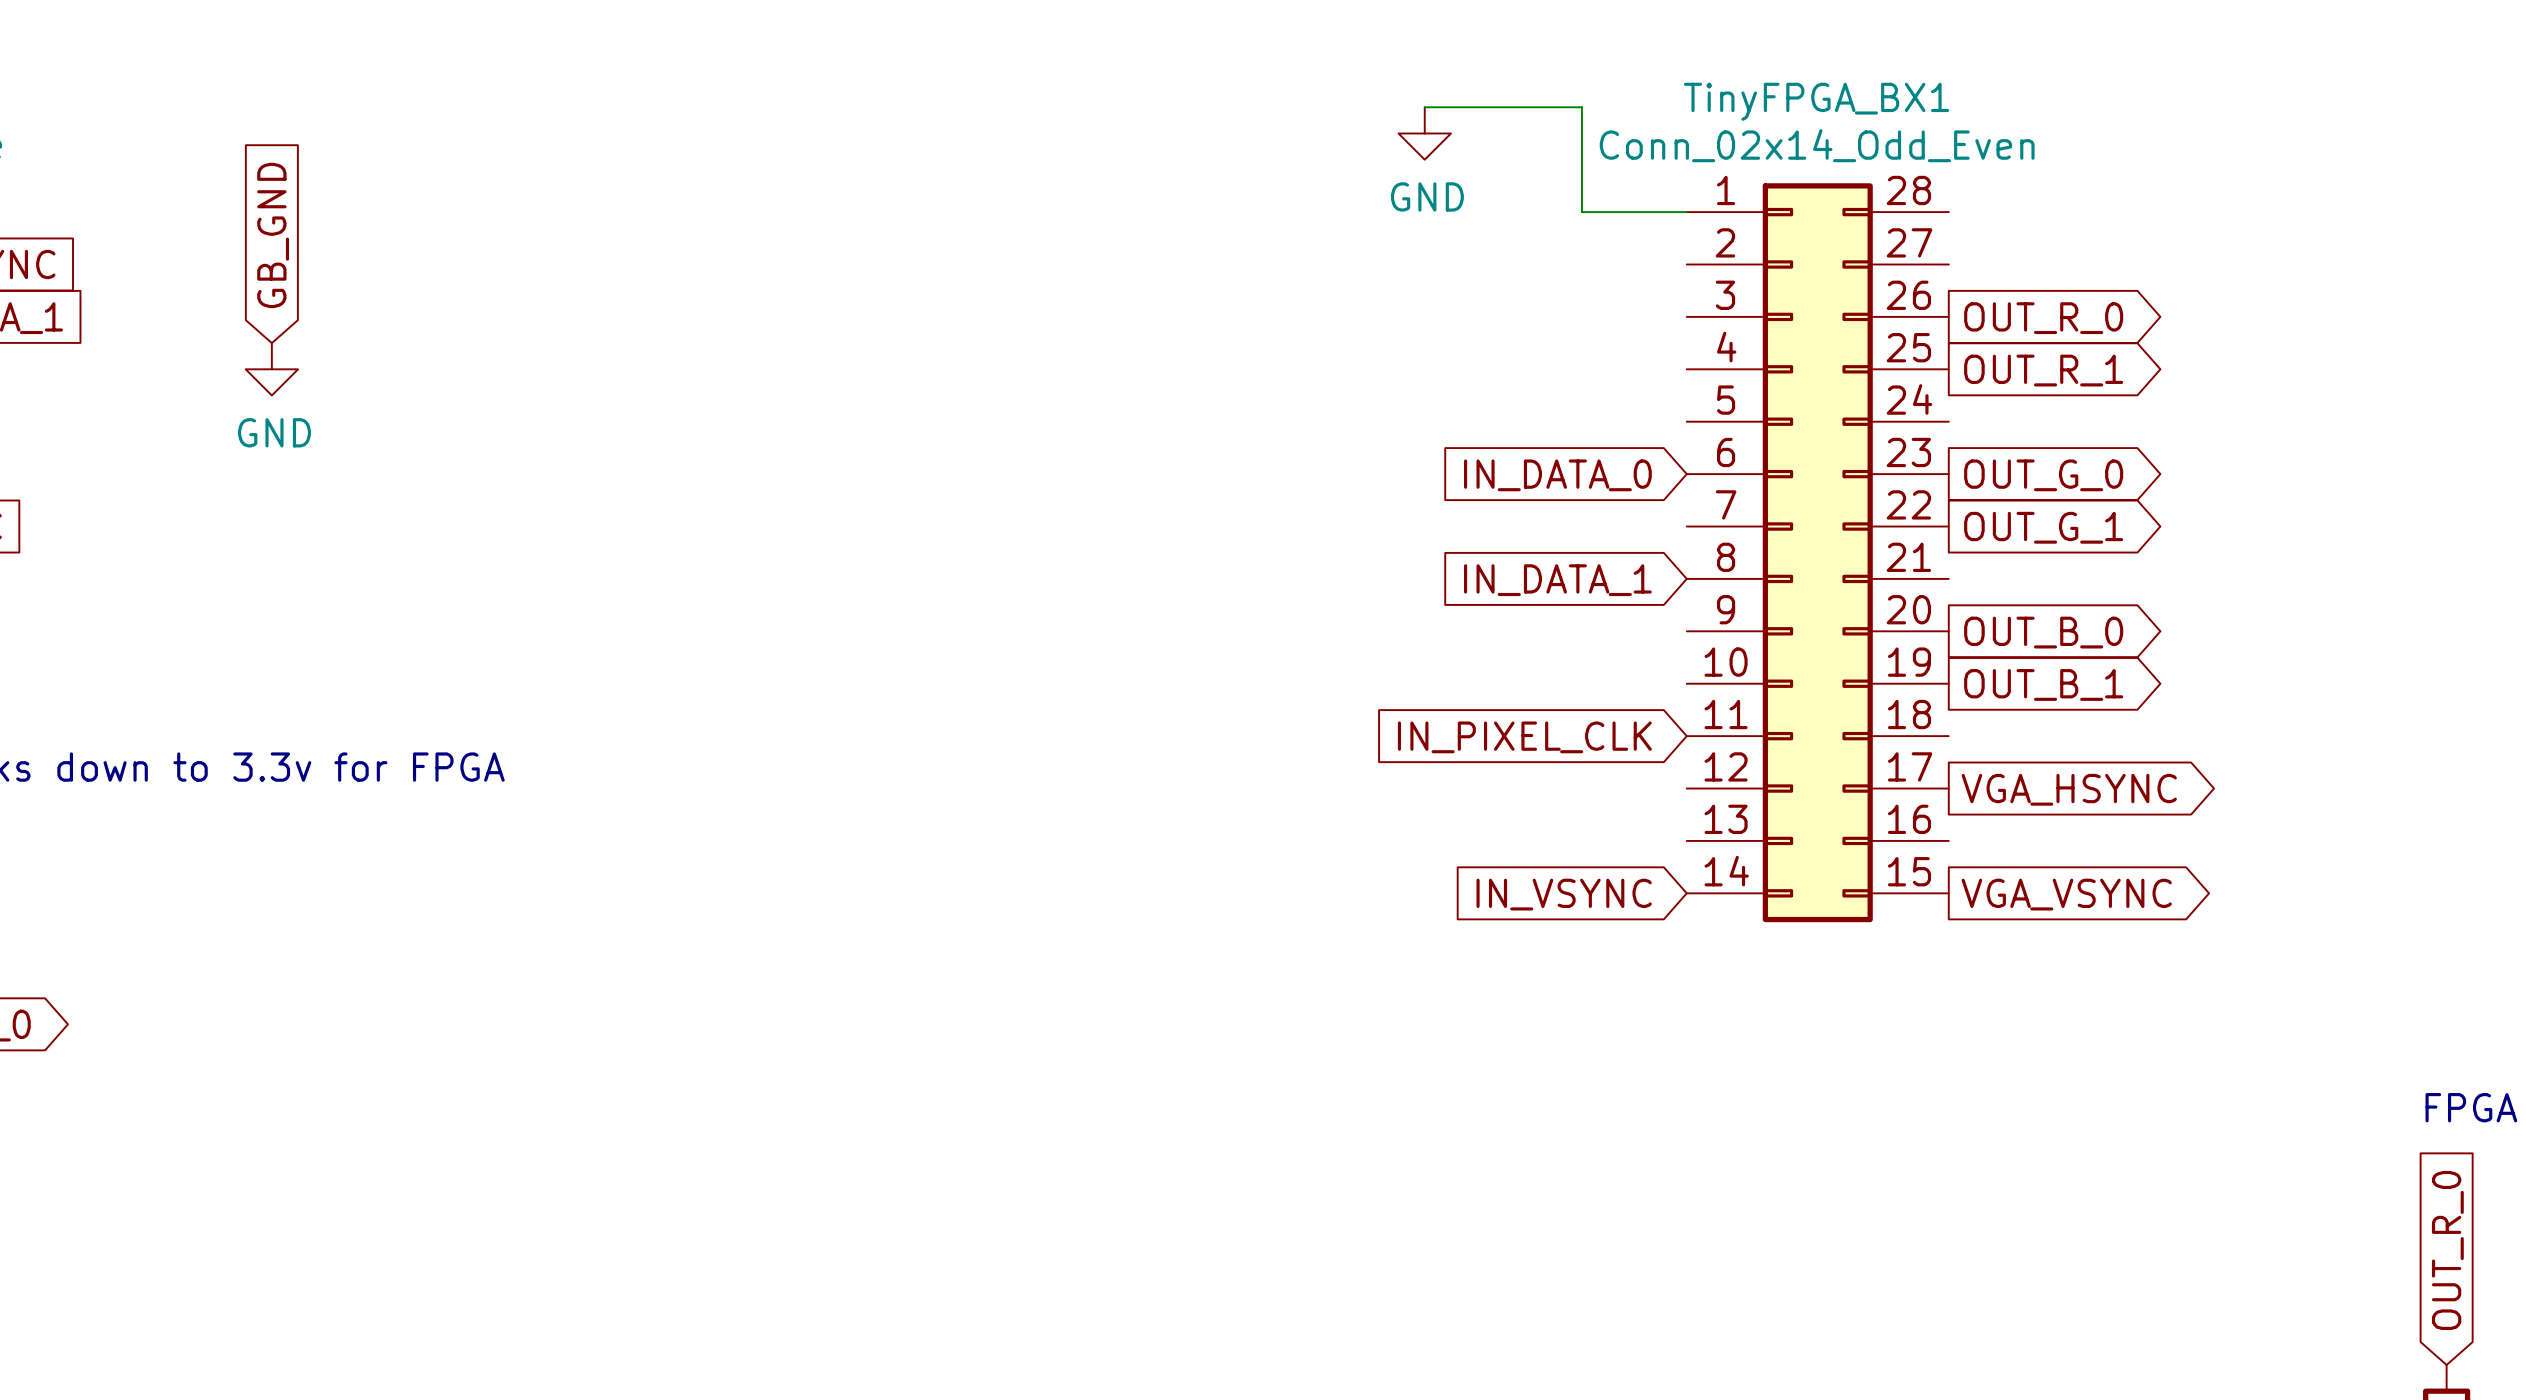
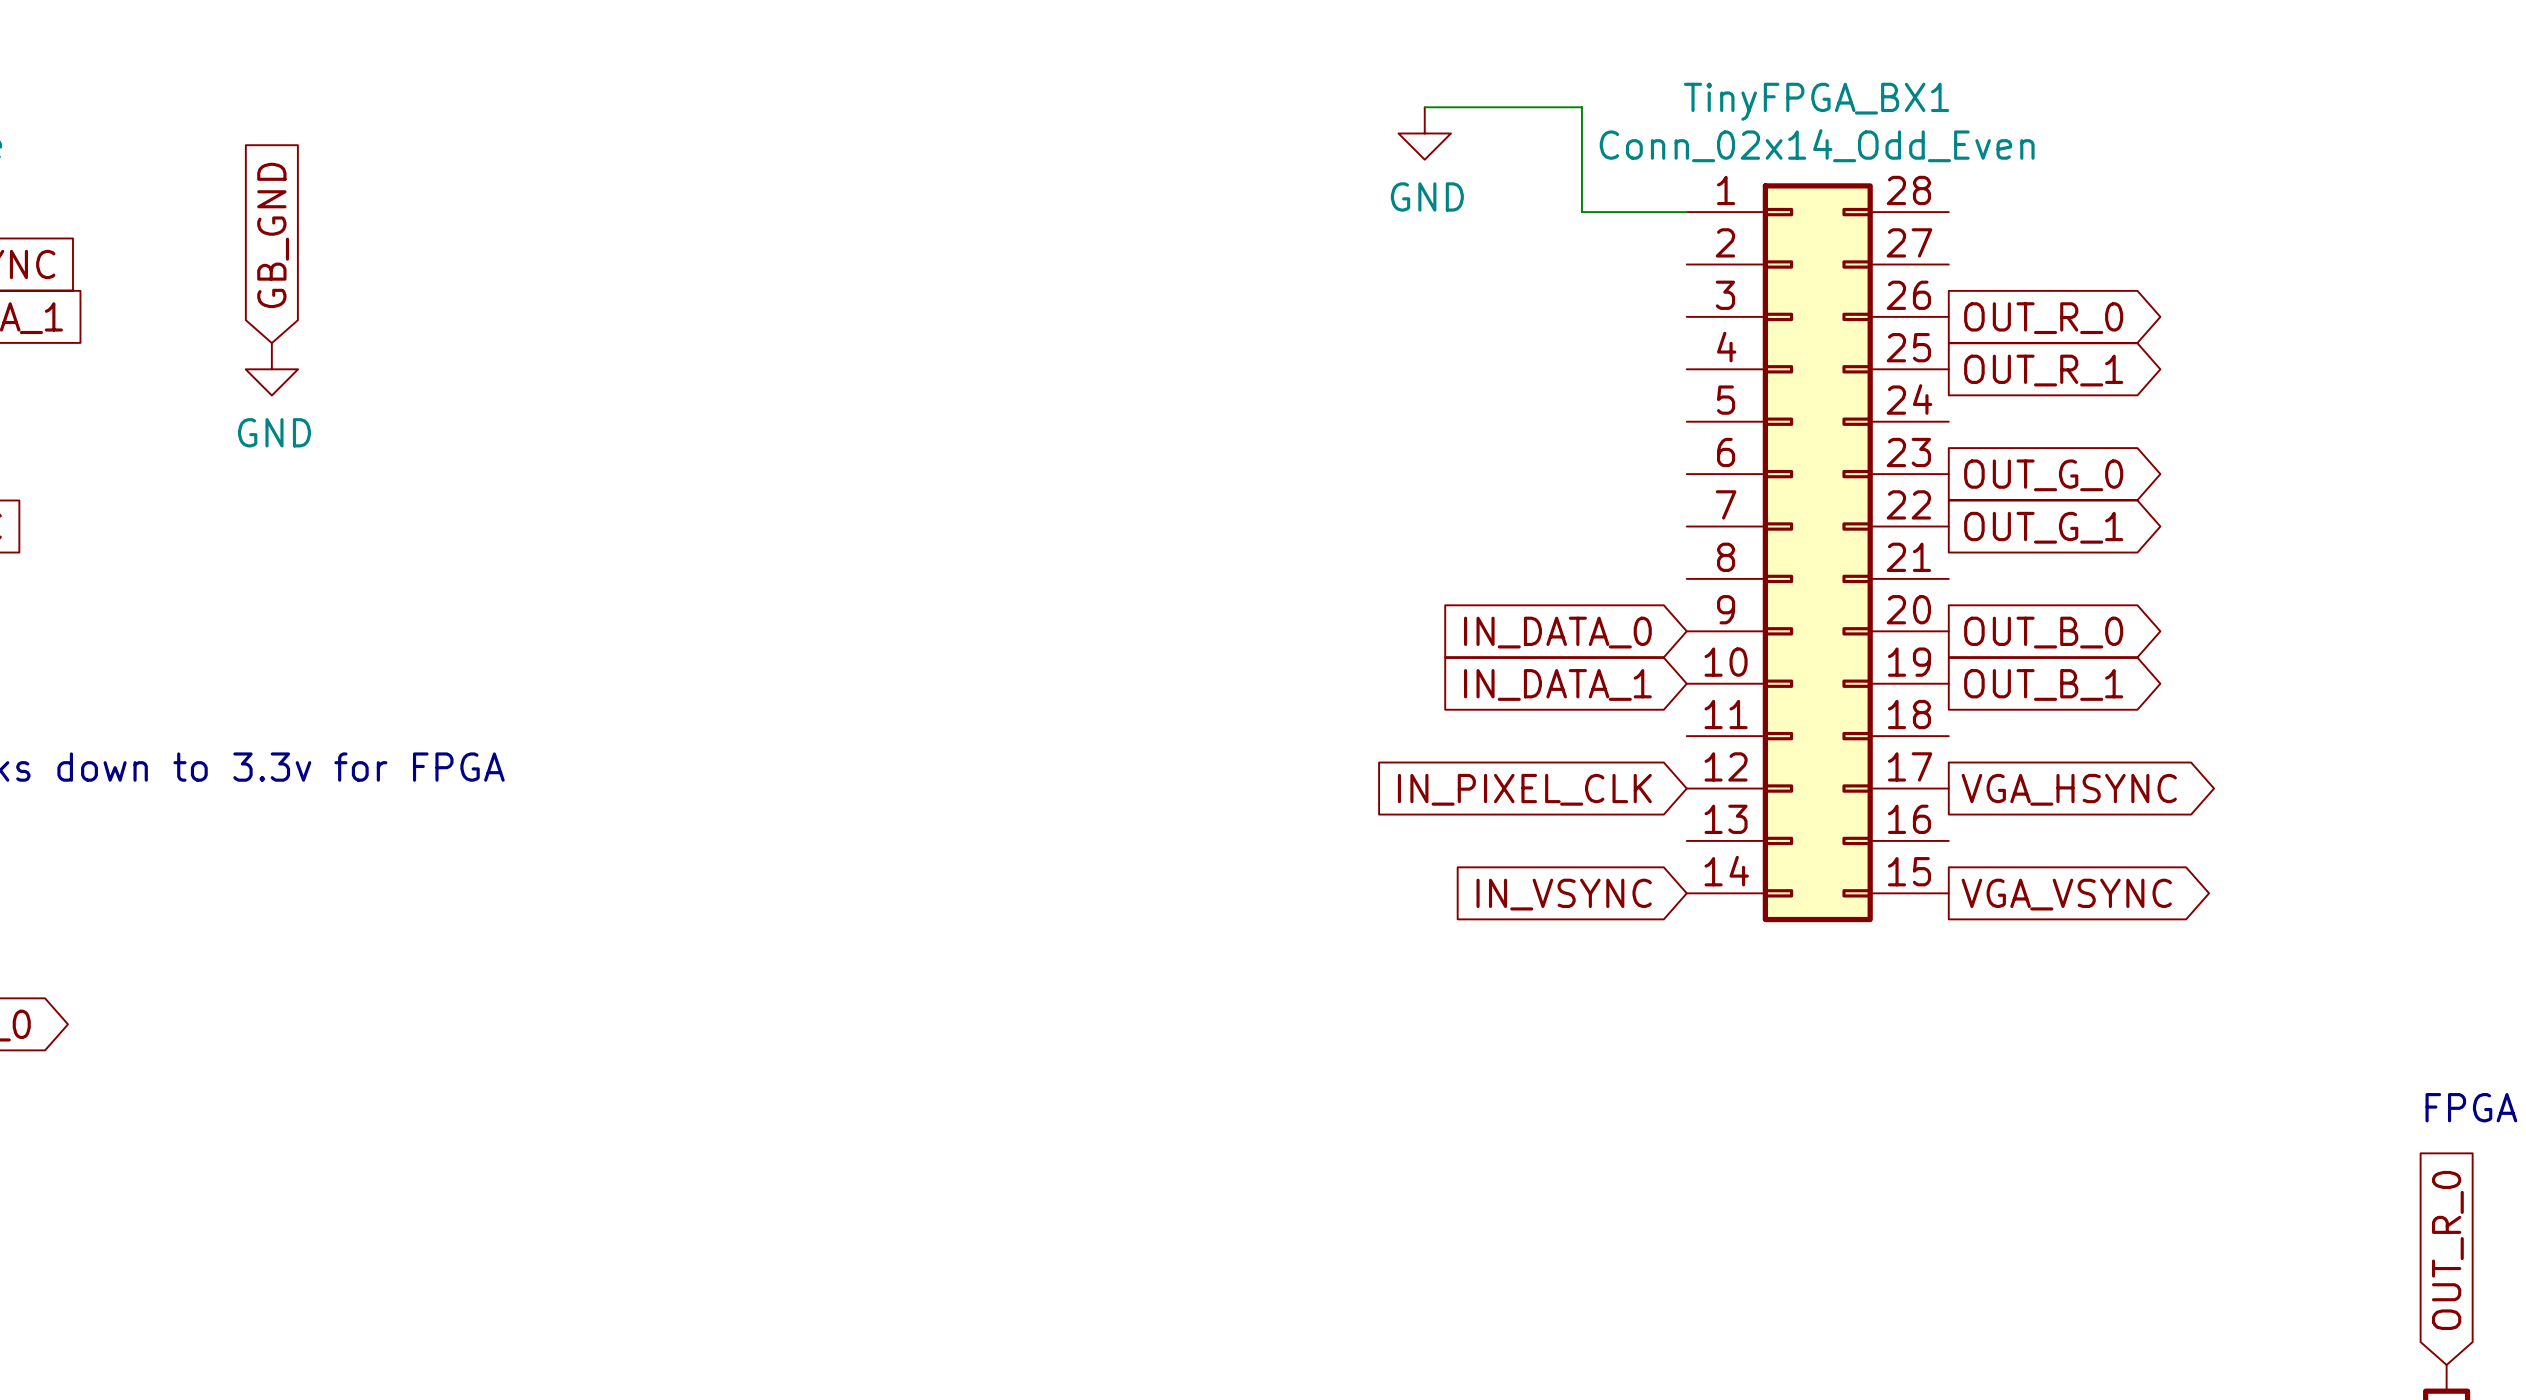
global label position: IN_DATA_0 (1557, 475) -> IN_DATA_0 (1557, 632)
global label position: IN_DATA_1 (1557, 580) -> IN_DATA_1 (1557, 684)
global label position: IN_PIXEL_CLK (1524, 737) -> IN_PIXEL_CLK (1524, 789)

